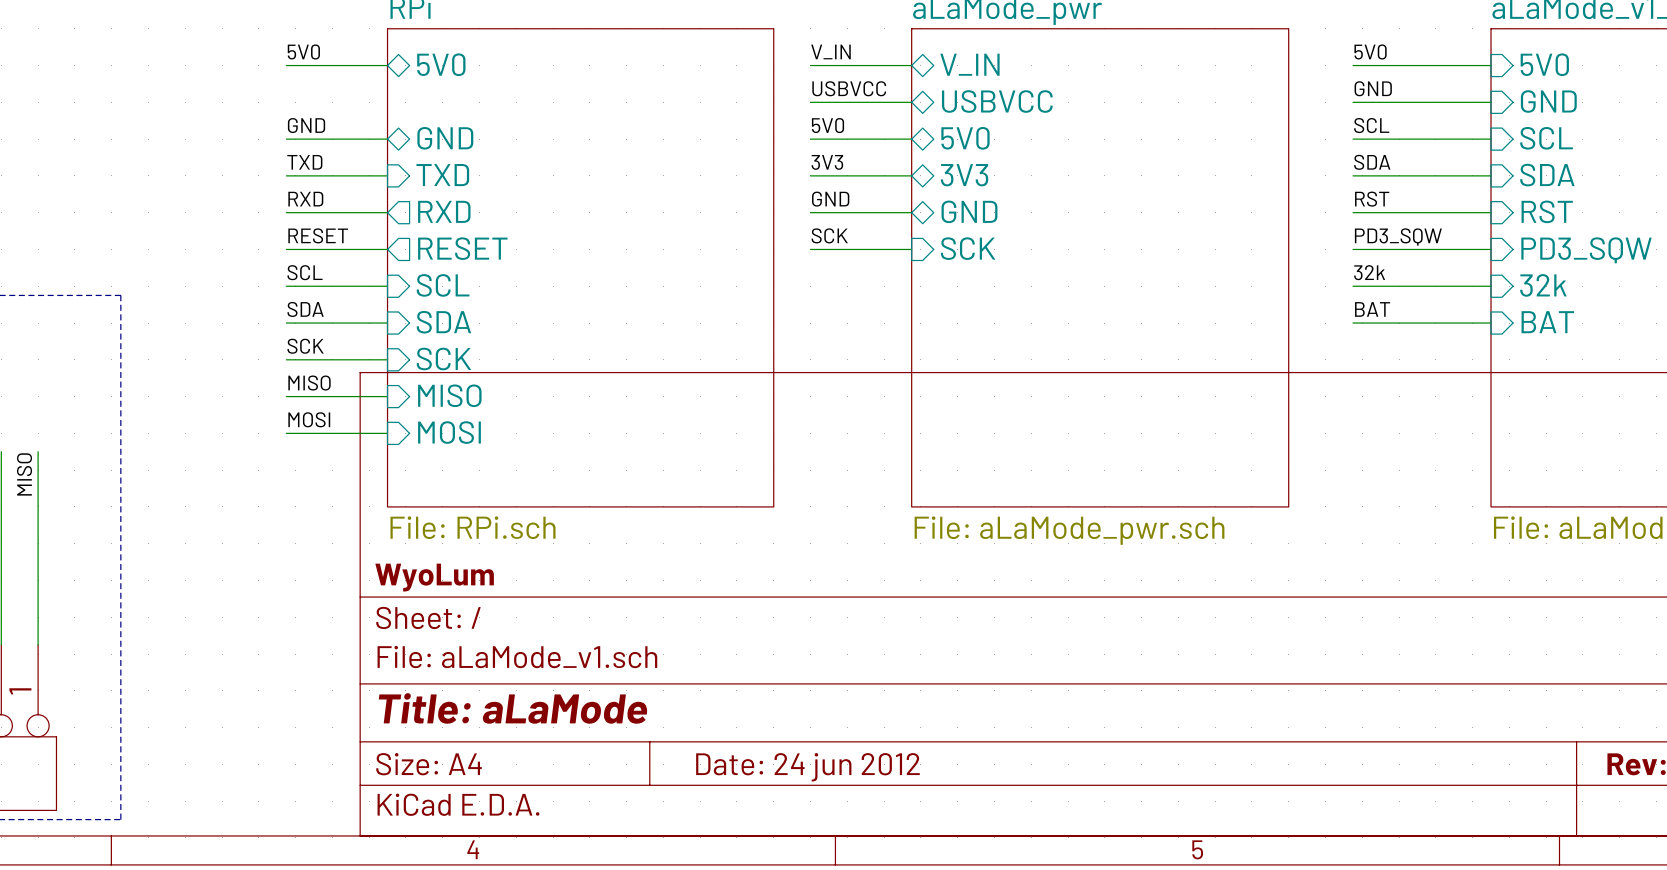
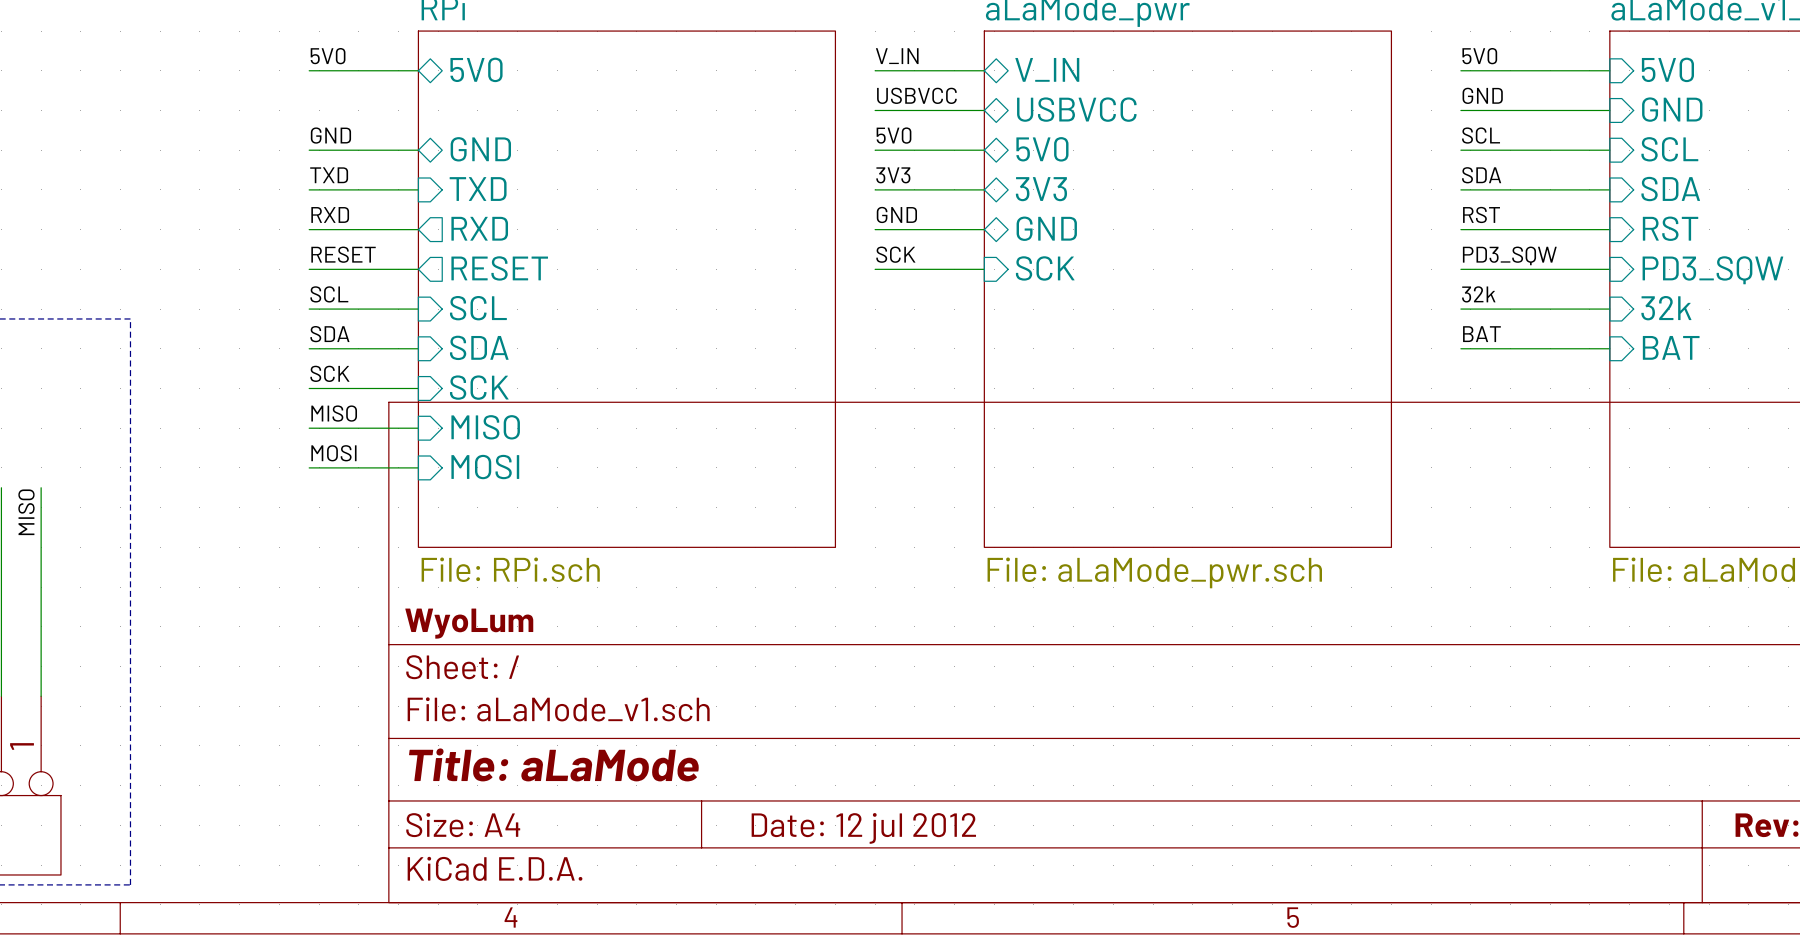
title block: Date: 24 jun 2012 (807, 767) -> Date: 12 jul 2012 (863, 828)

